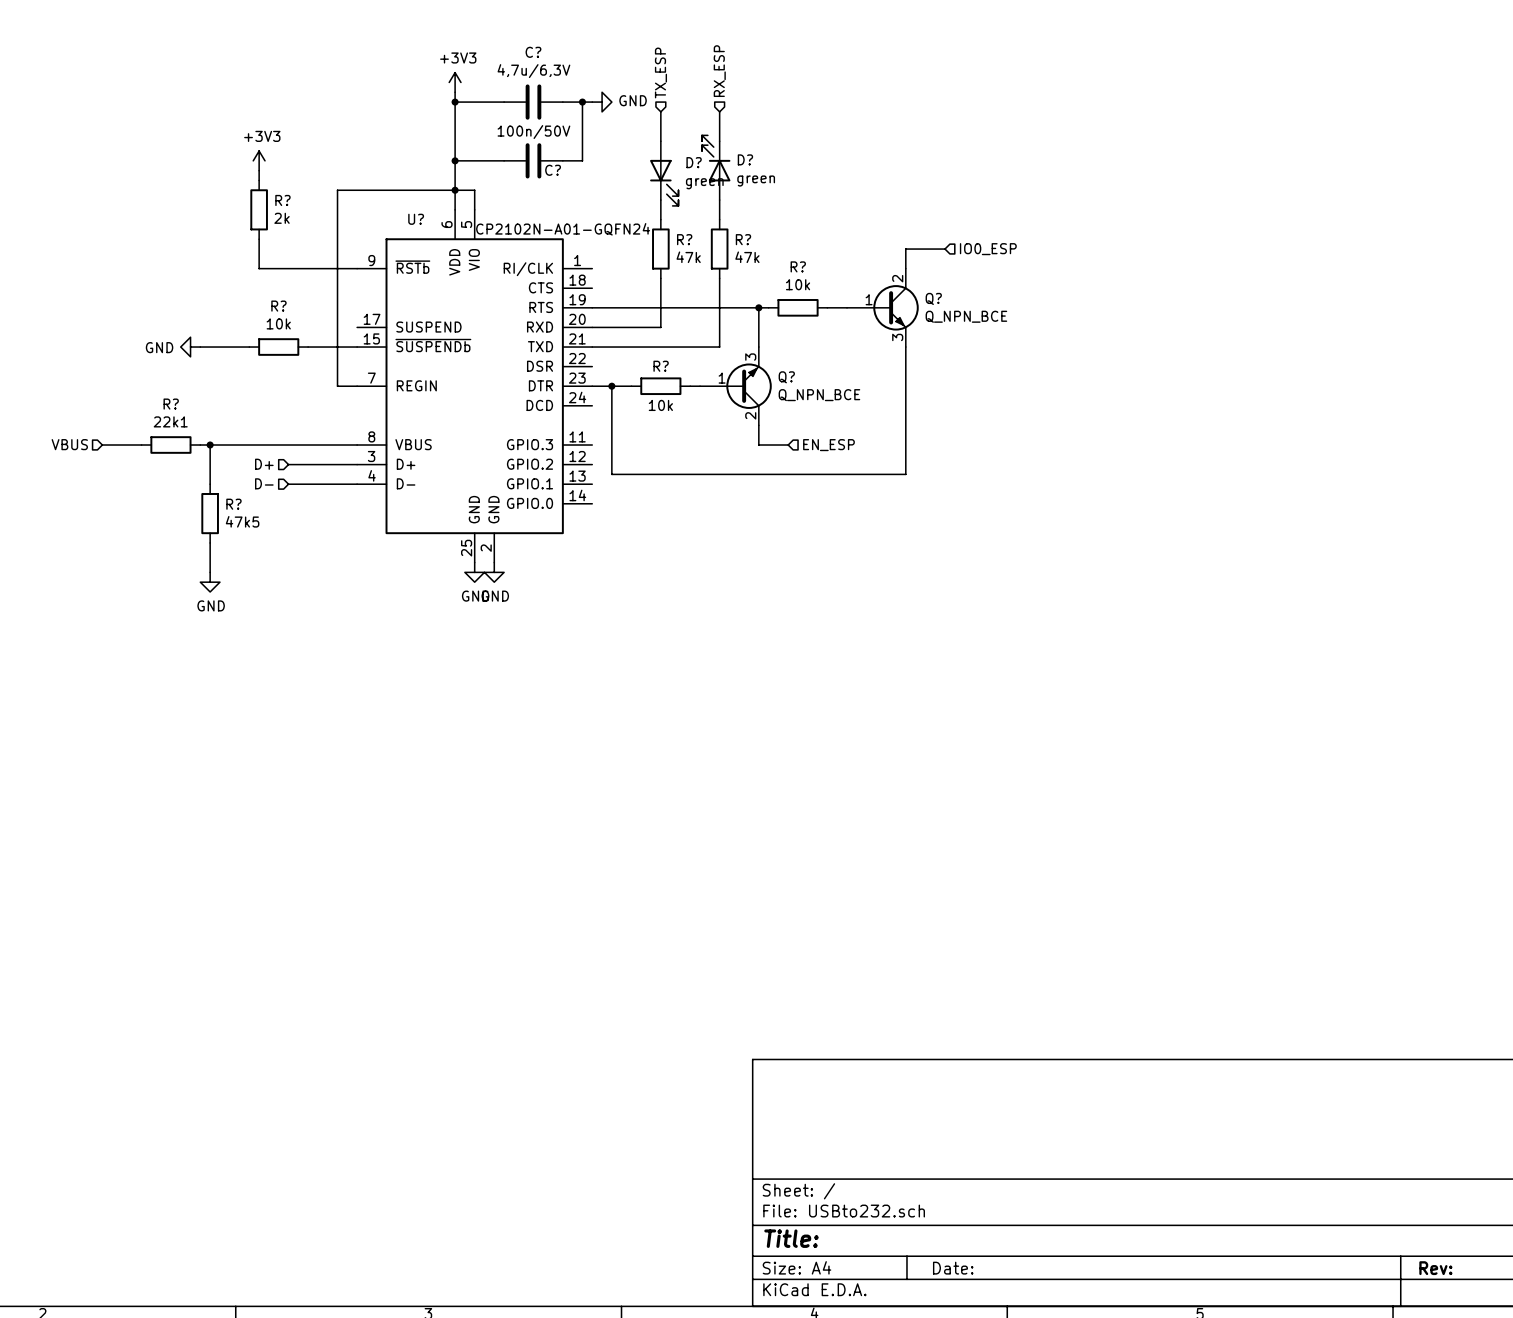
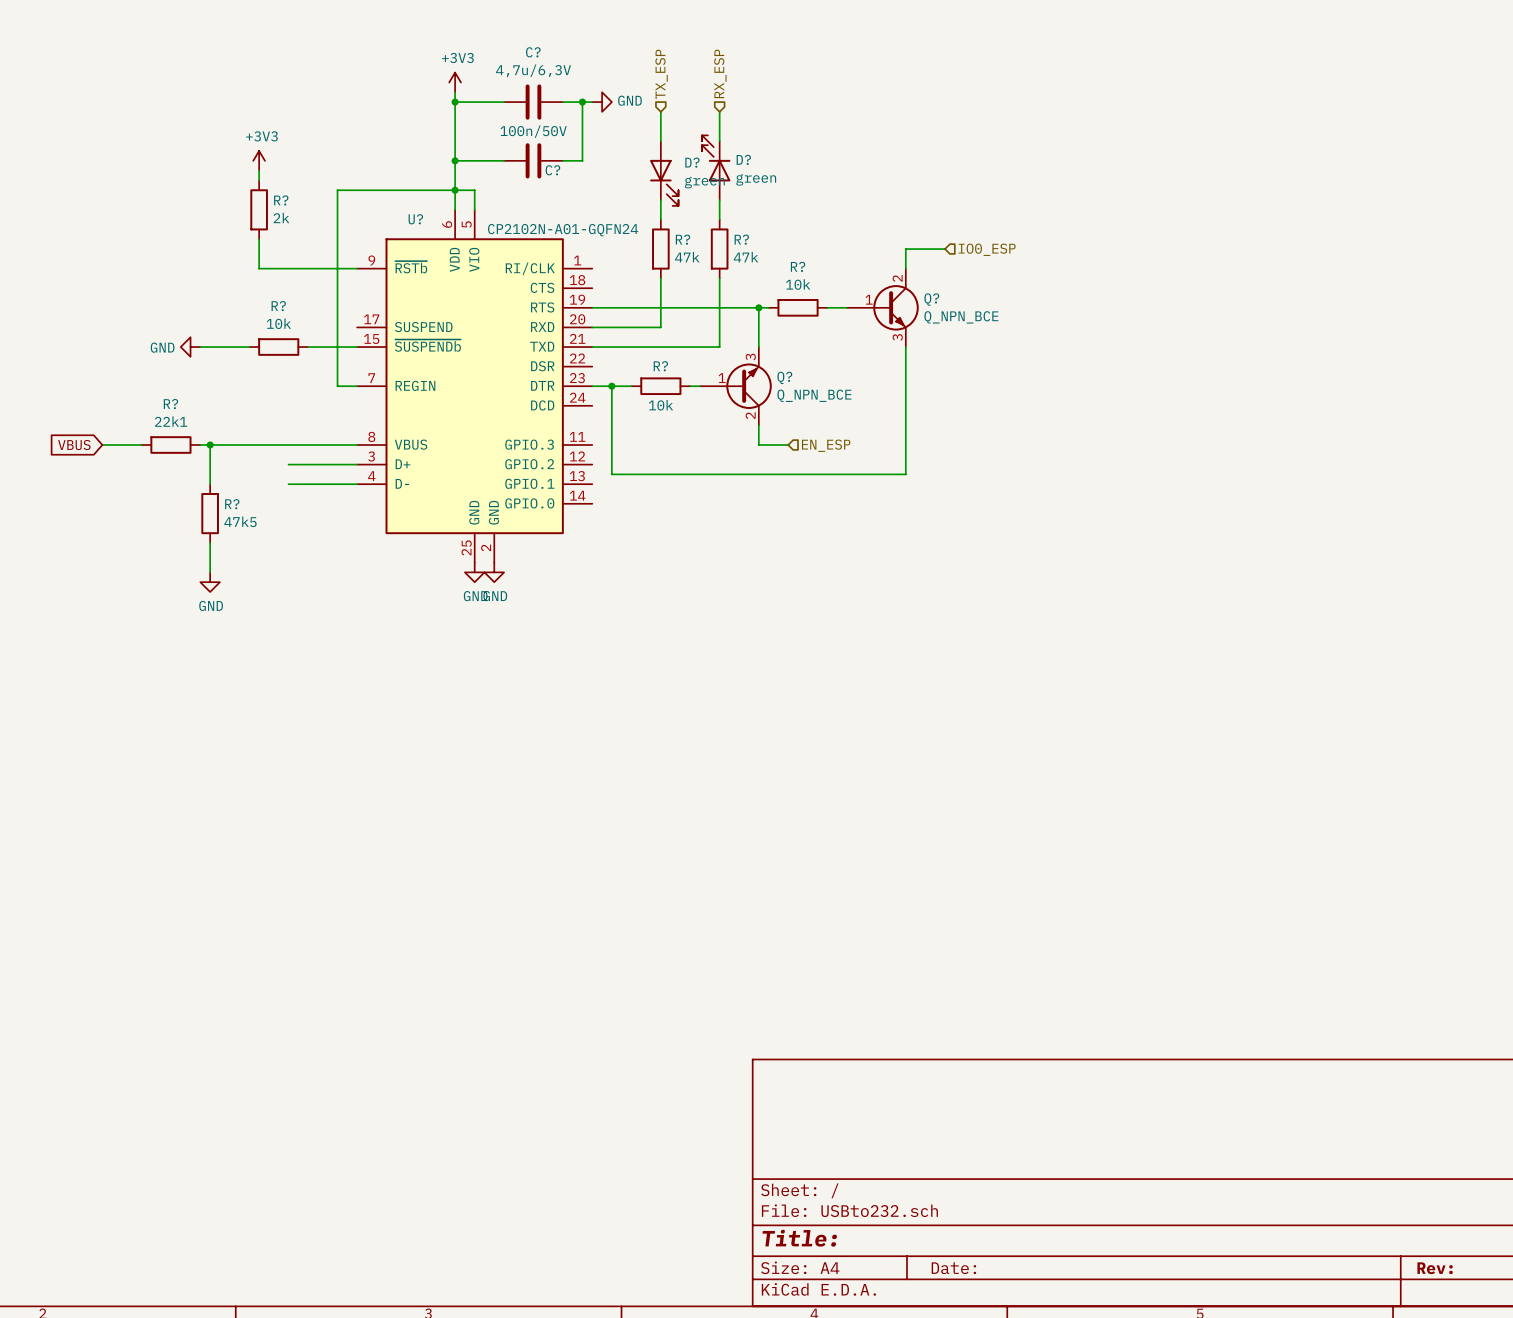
hierarchical label: VBUS (69, 444) -> none
global label: none -> VBUS (74, 445)
hierarchical label: D+ (264, 464) -> none
hierarchical label: D- (264, 483) -> none

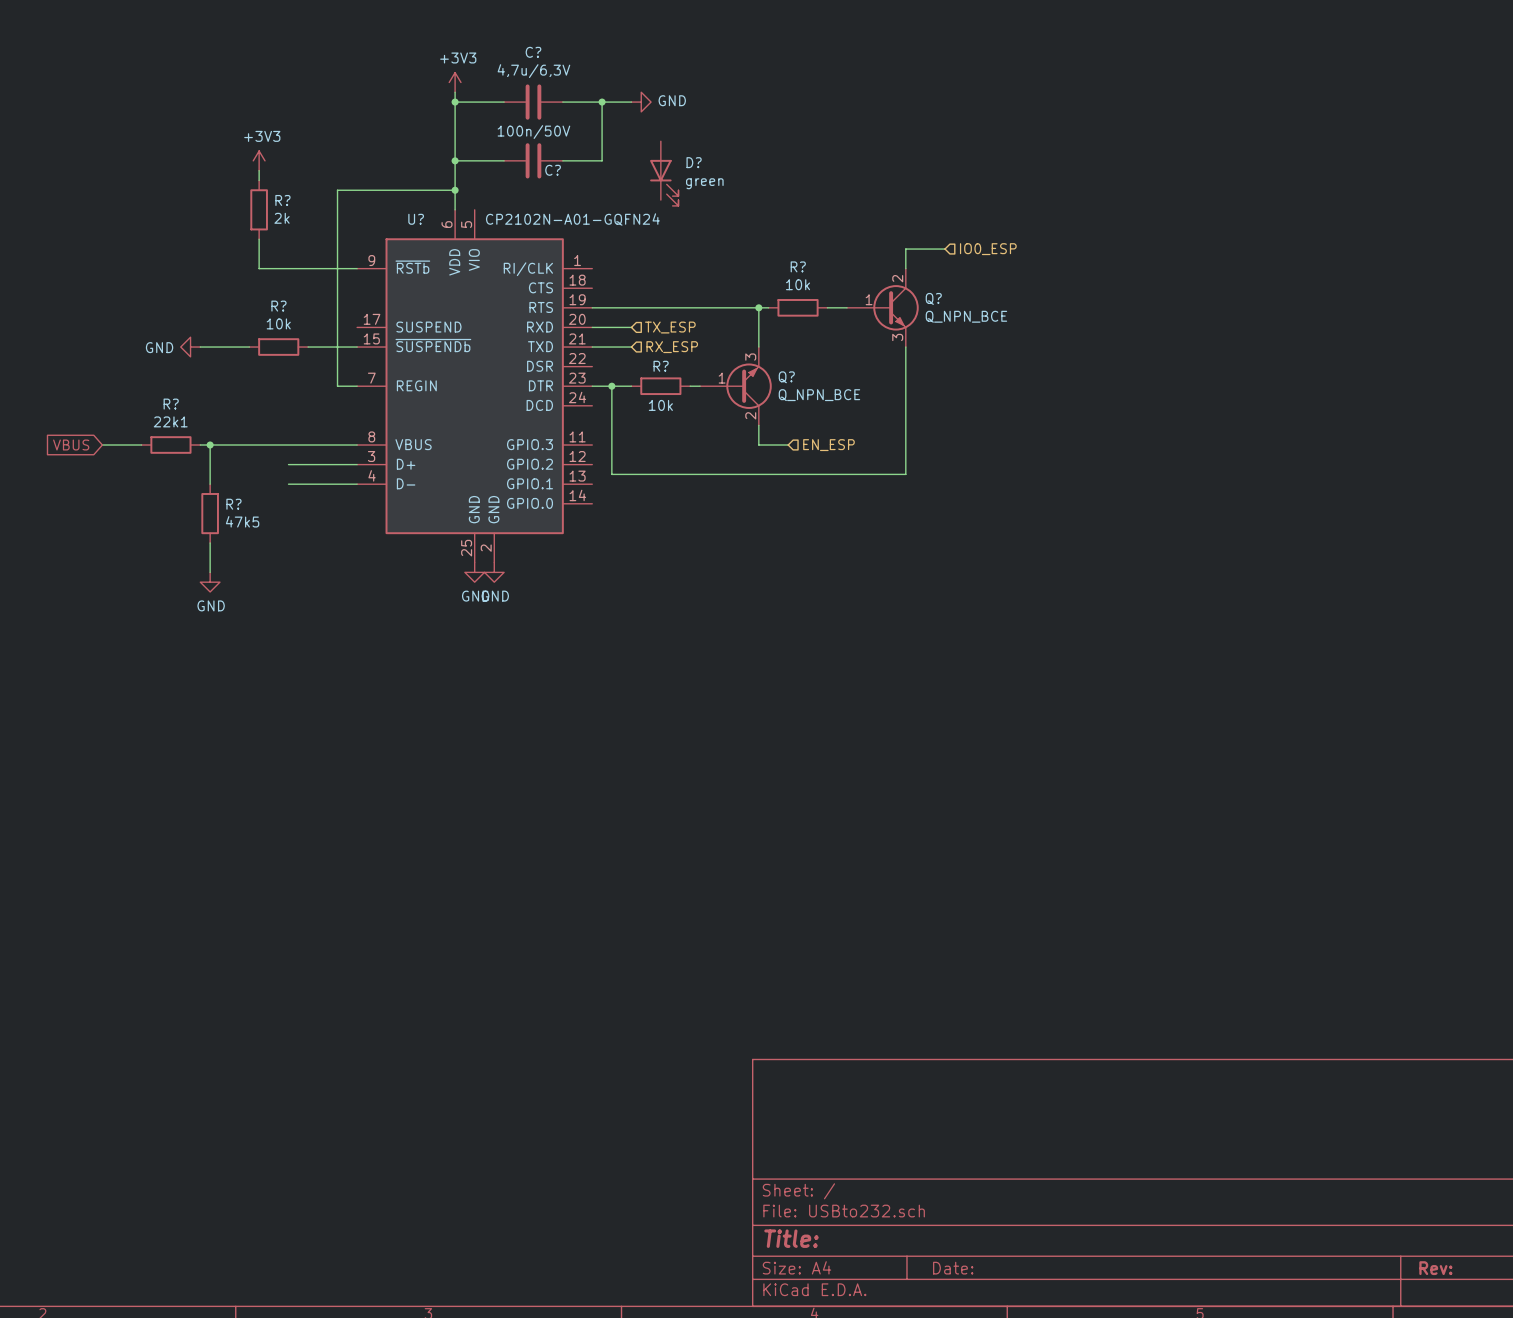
hierarchical label: RX_ESP (720, 73) -> none
hierarchical label: TX_ESP (661, 74) -> none
wire: (582, 102) (582, 160) -> (602, 102) (602, 160) (582, 160)
junction position: (582, 102) -> (602, 102)
wire: none -> (592, 102) (631, 102)
power symbol position: GND (602, 102) -> GND (641, 102)
wire: (660, 111) (660, 141) -> none
wire: (719, 111) (719, 141) -> none
D?: green (716, 167) -> none
wire: (455, 190) (474, 190) (474, 209) -> none
wire: (660, 200) (660, 219) -> none
wire: (719, 200) (719, 219) -> none
U? value position: CP2102N-A01-GQFN24 (563, 230) -> CP2102N-A01-GQFN24 (572, 219)
R?: 47k (660, 249) -> none
R?: 47k (719, 249) -> none
wire: (660, 278) (660, 327) (631, 327) -> none
wire: (719, 278) (719, 347) (631, 347) -> none
hierarchical label: none -> TX_ESP (670, 327)
hierarchical label: none -> RX_ESP (672, 347)

